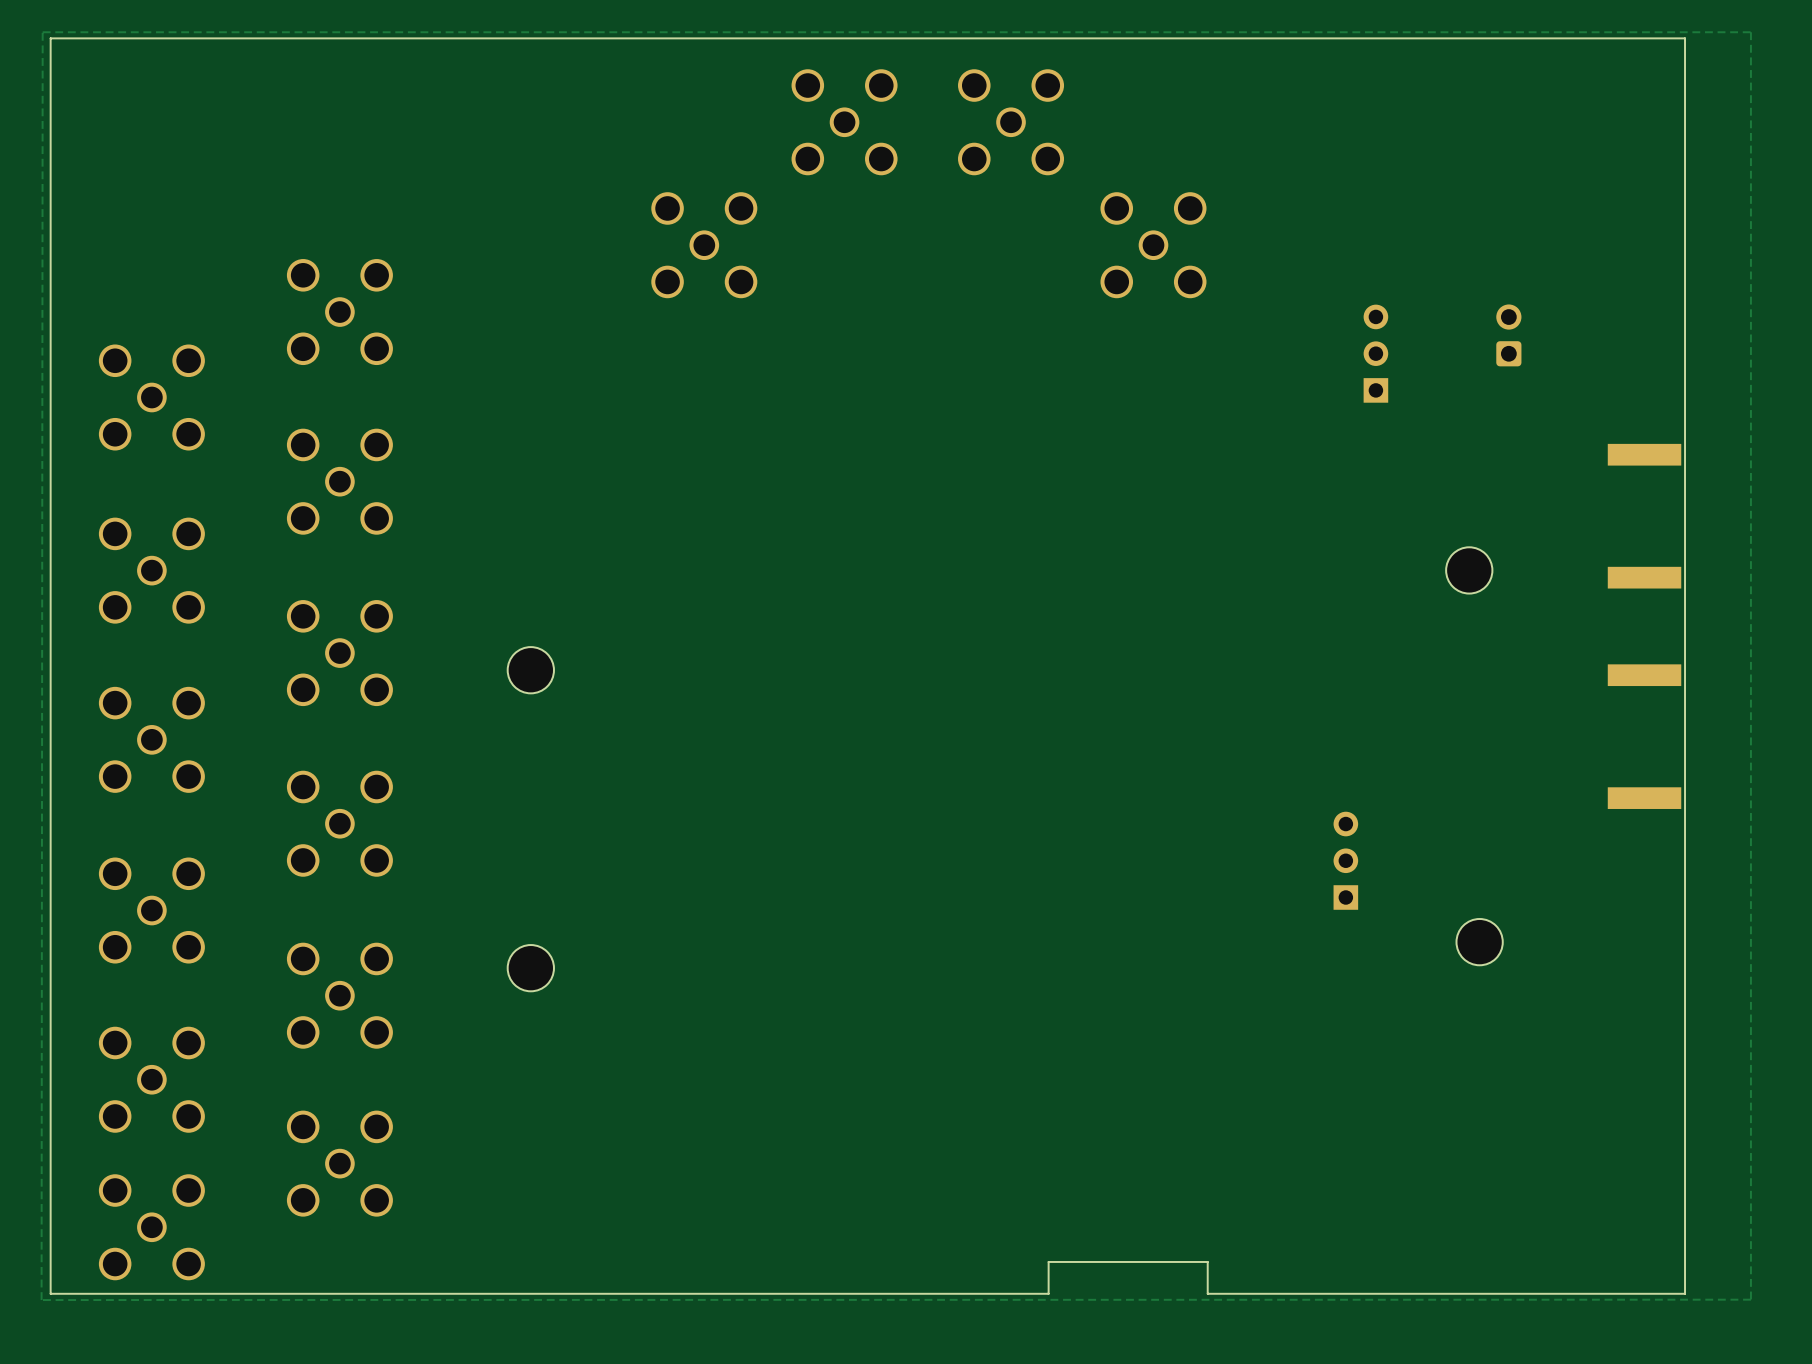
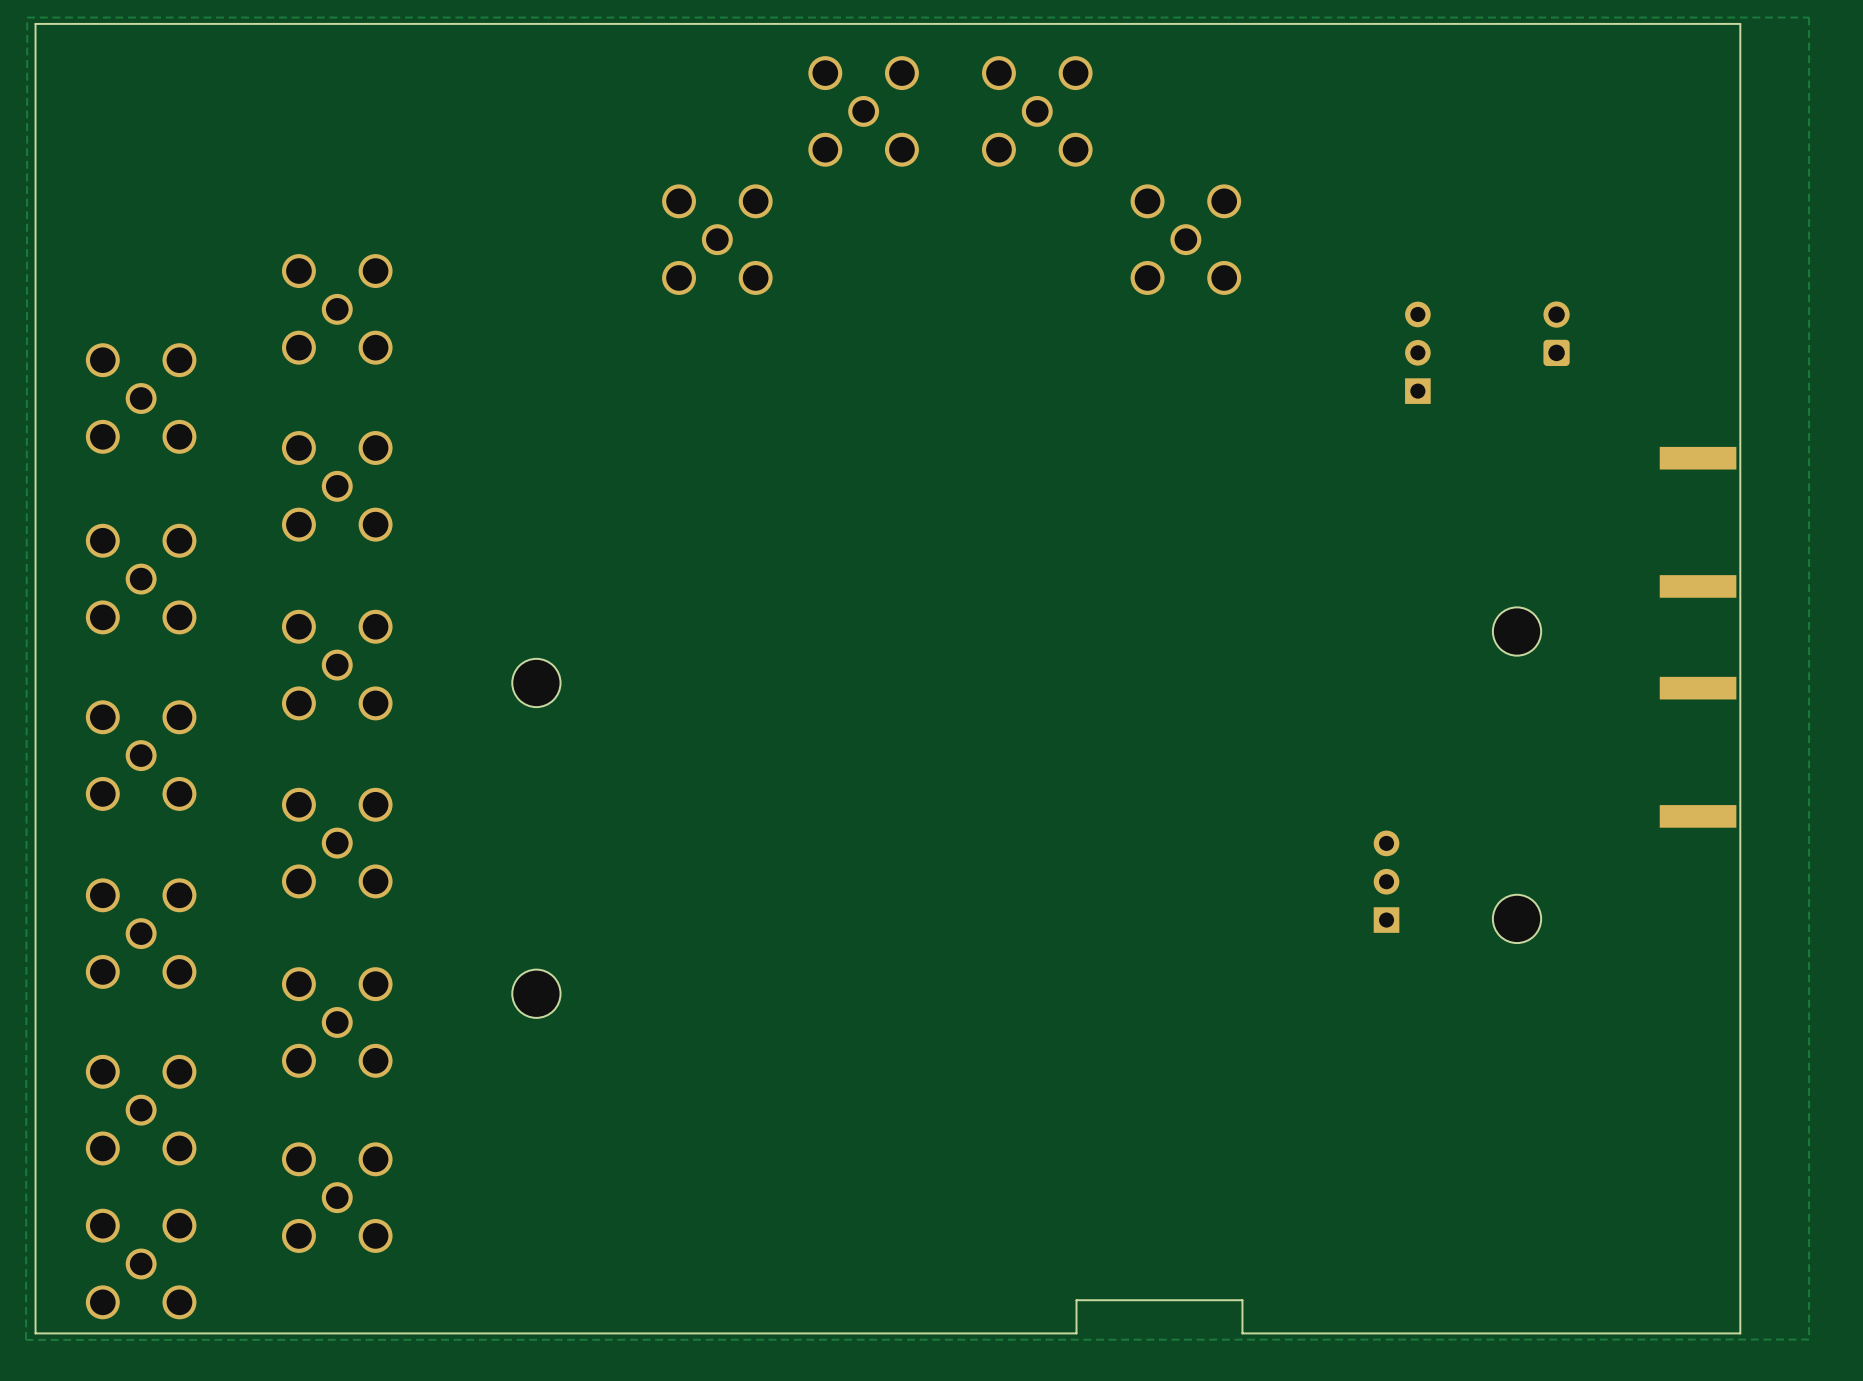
part position: (1469, 570) -> (1517, 631)
part position: (1479, 942) -> (1517, 918)

